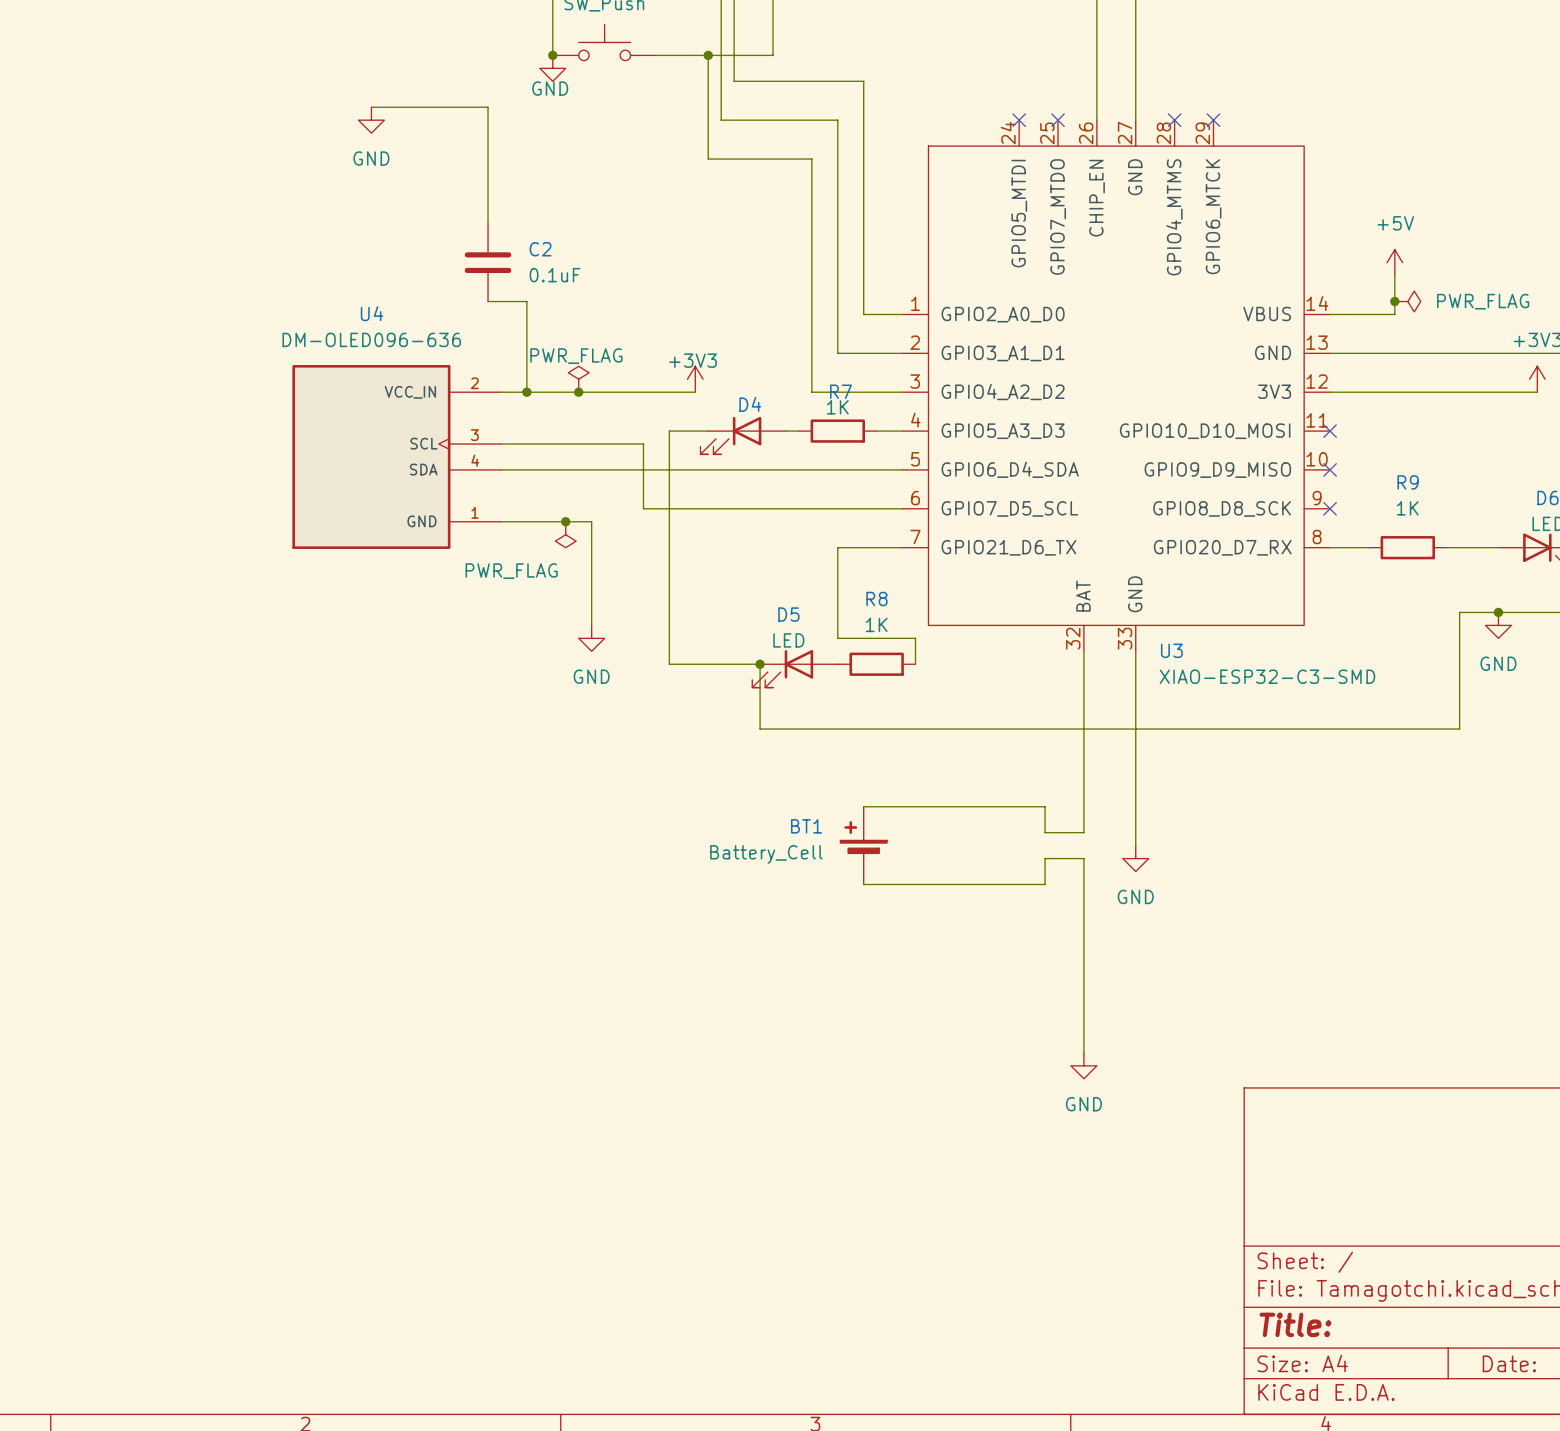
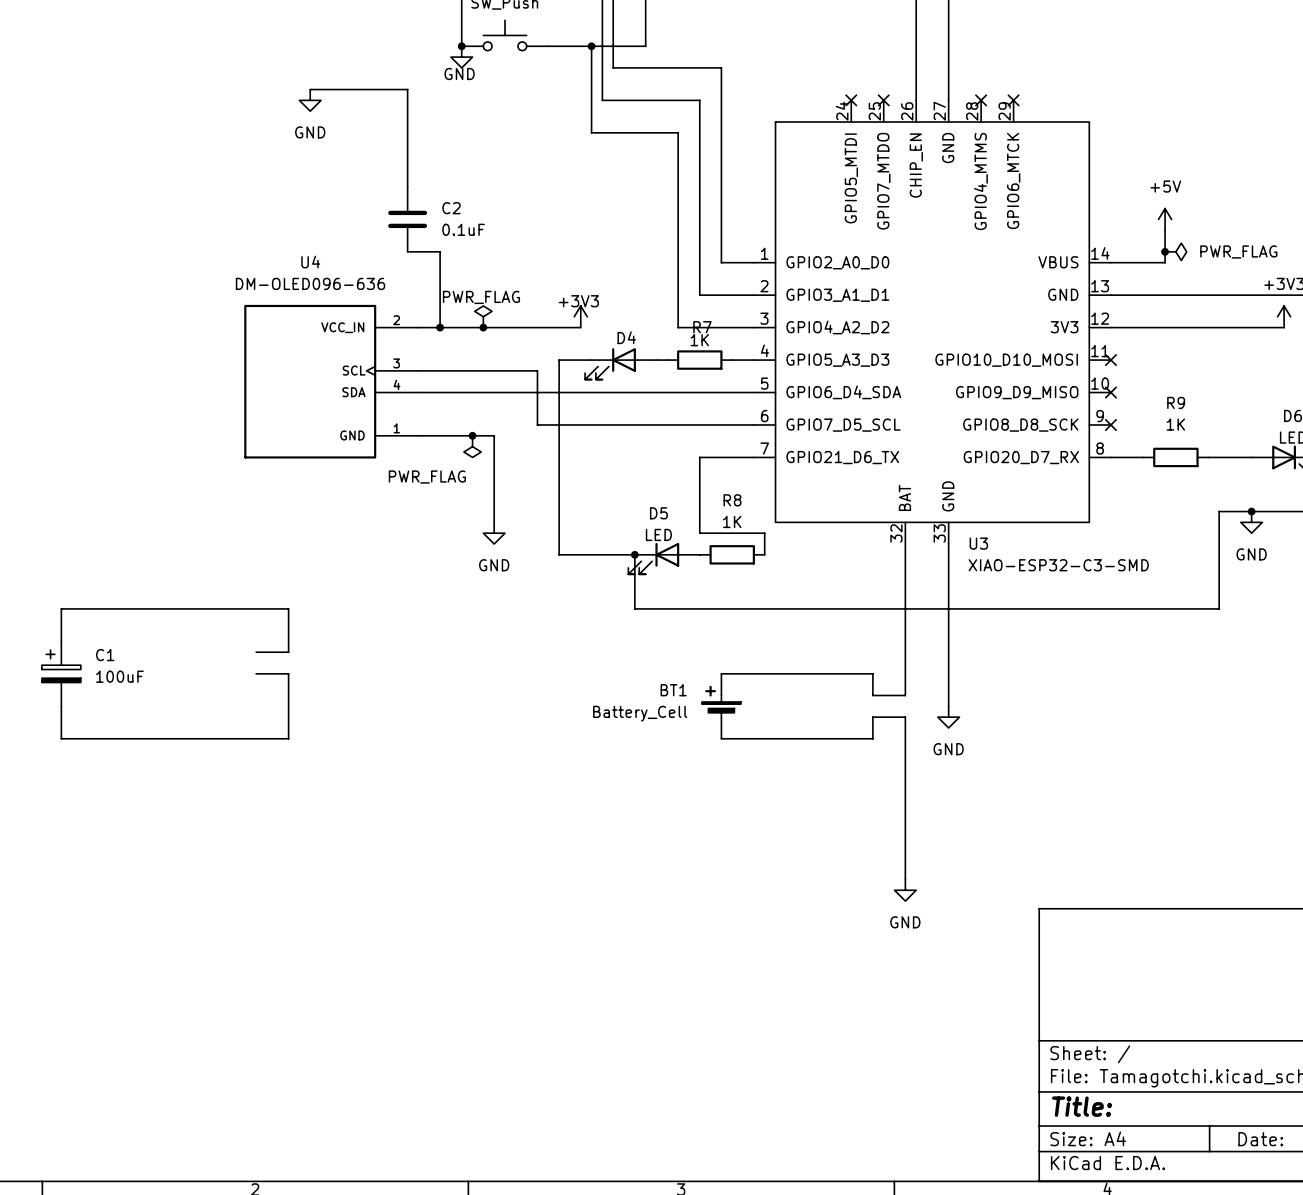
wire: none -> (61, 641) (61, 608) (288, 608) (288, 652) (256, 652)
C1: none -> 100uF (61, 673)
wire: none -> (256, 673) (288, 673) (288, 738) (61, 738) (61, 706)

